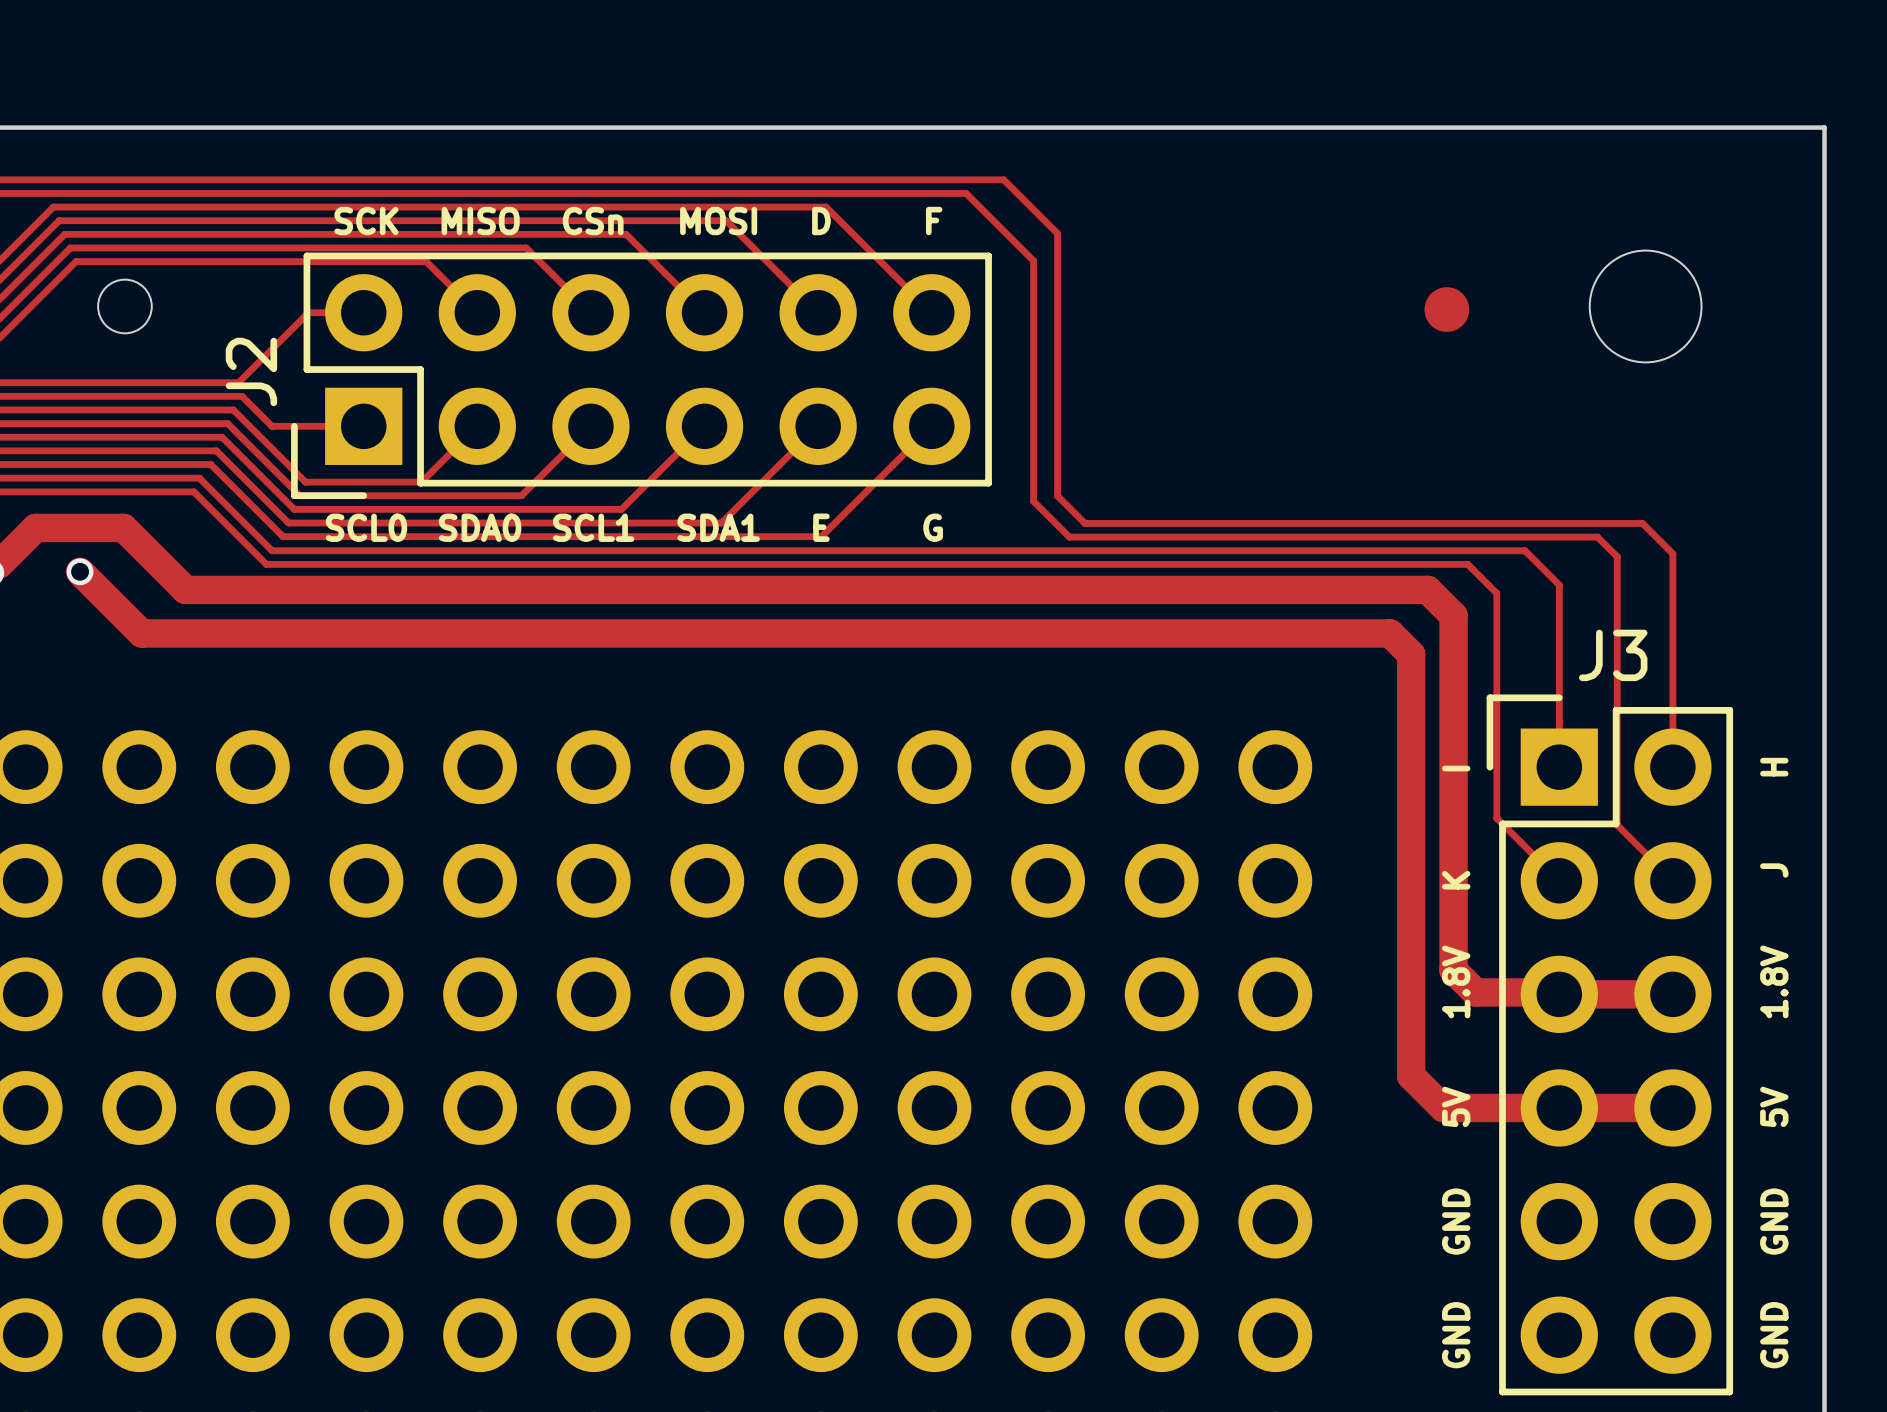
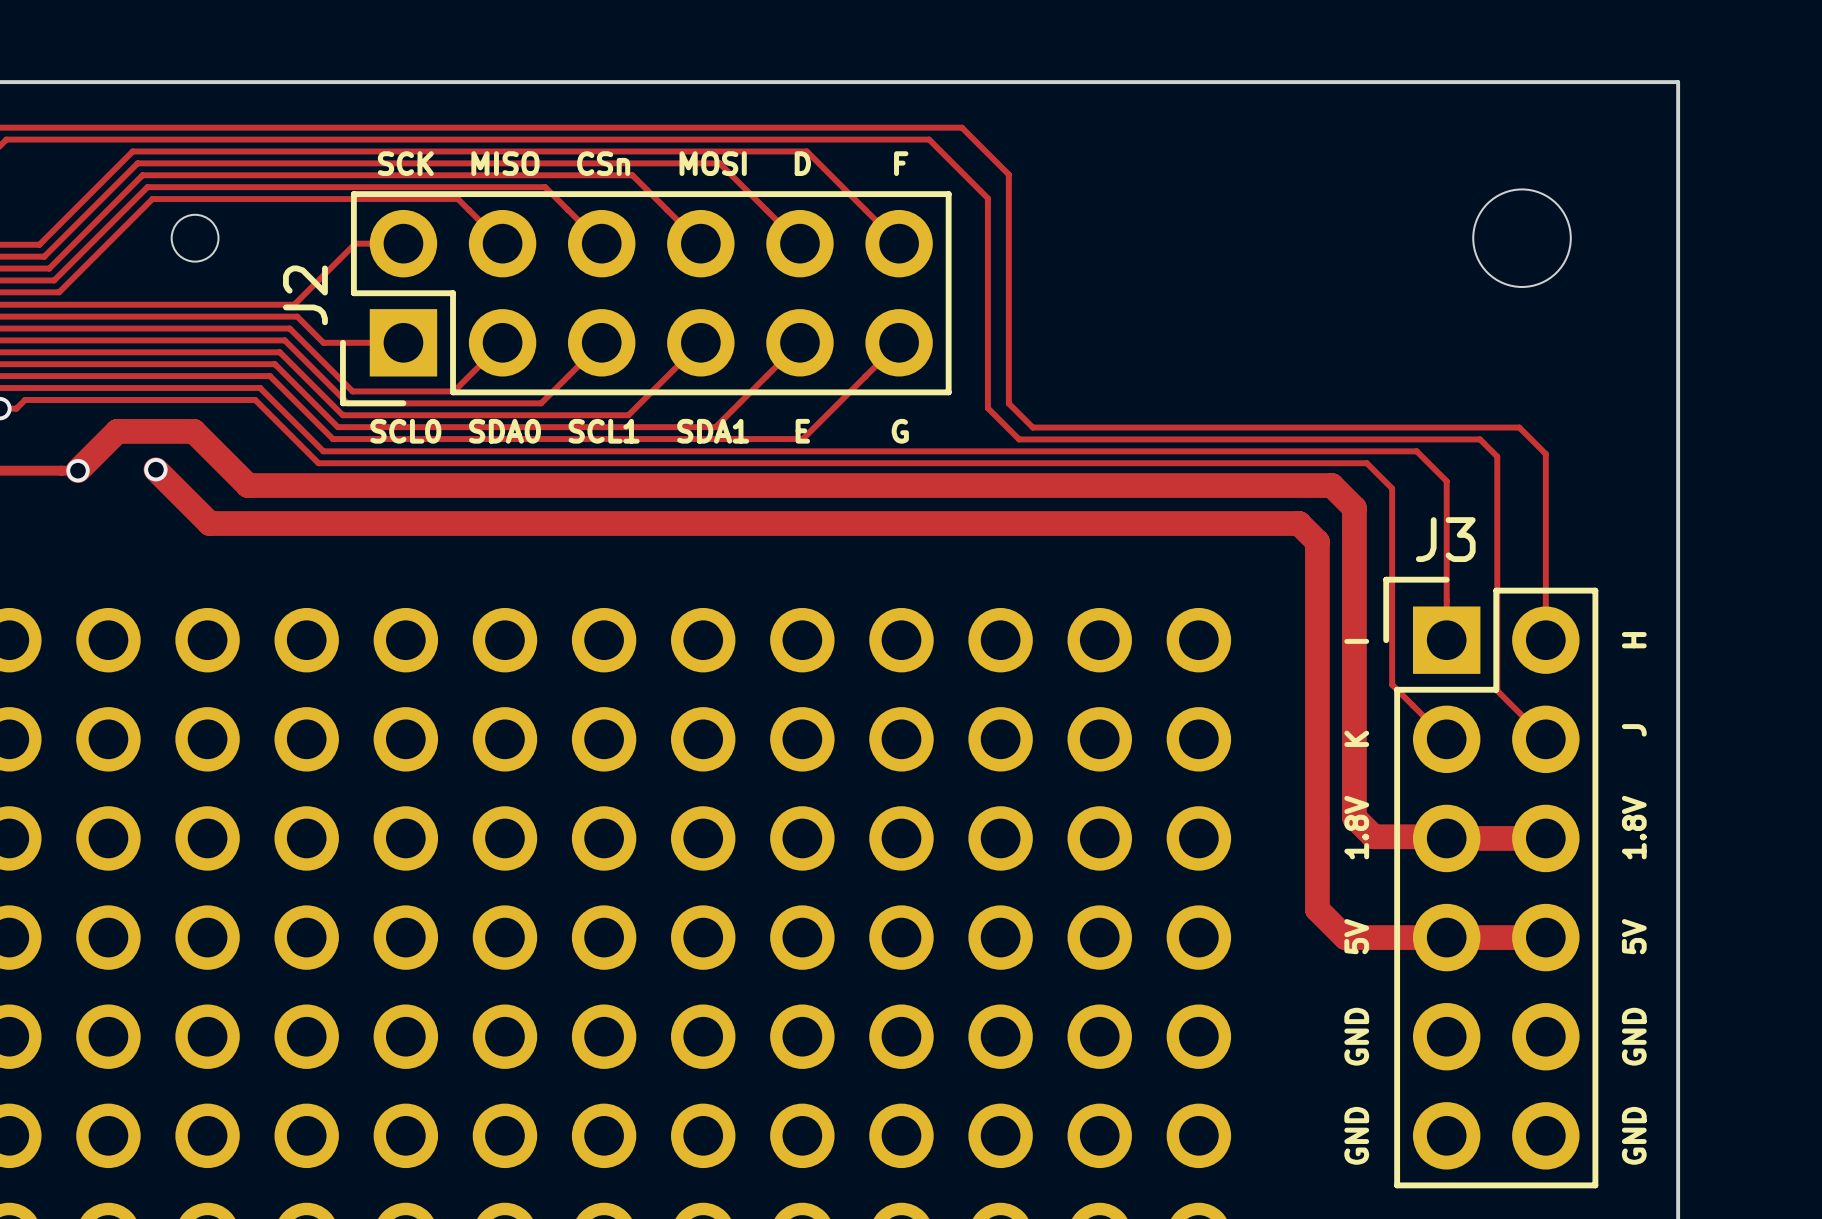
part: (1446, 309) -> none
J3 name position: J3 (1613, 655) -> J3 (1445, 539)

